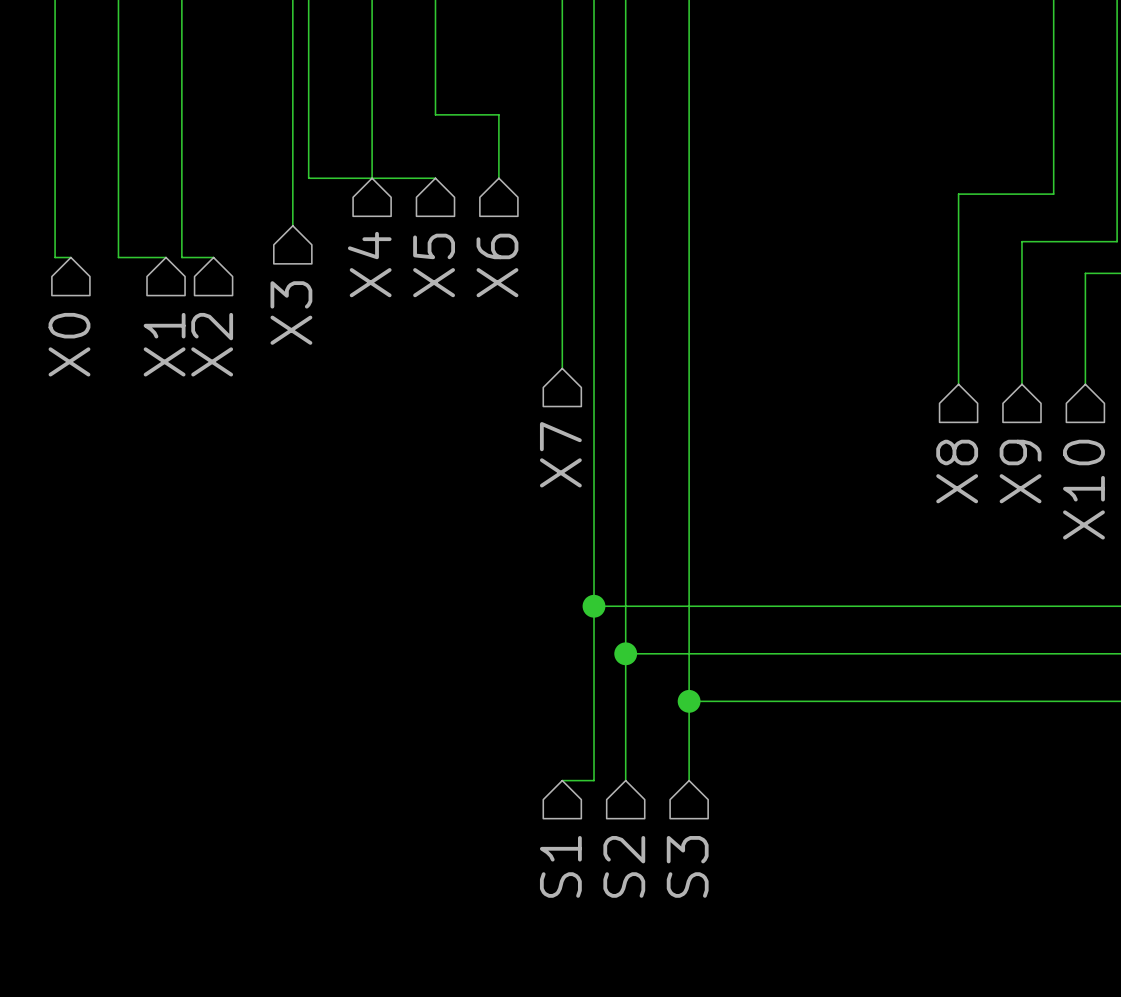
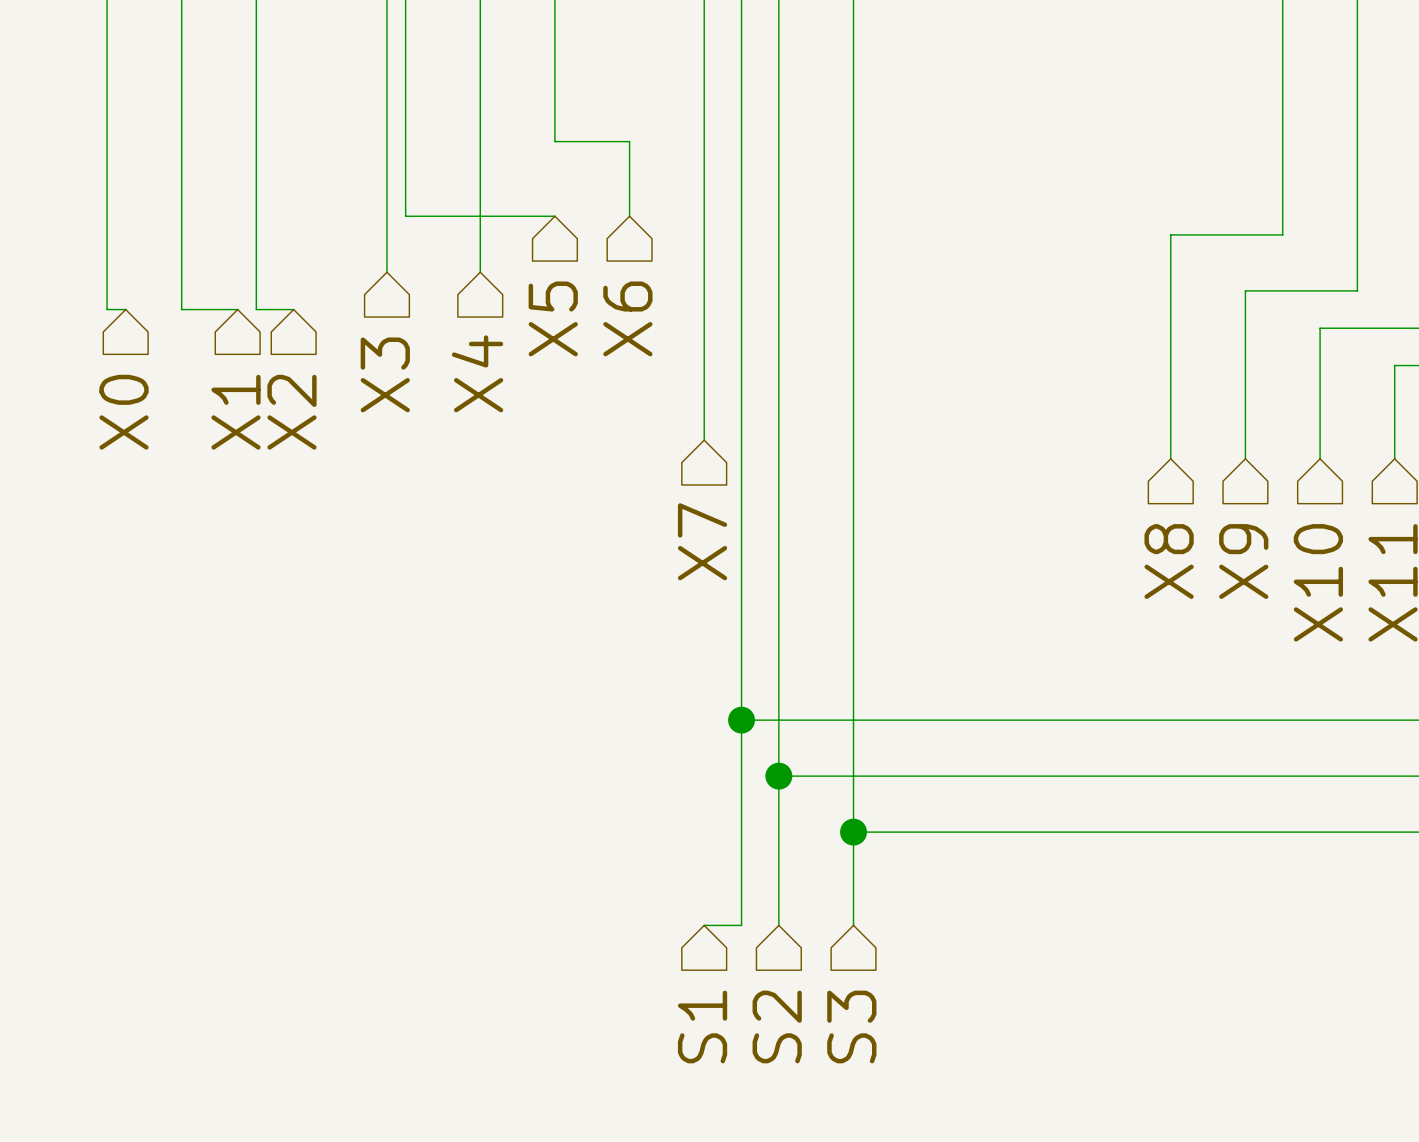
wire: none -> (480, 216) (480, 272)
hierarchical label position: X4 (369, 264) -> X4 (477, 373)

